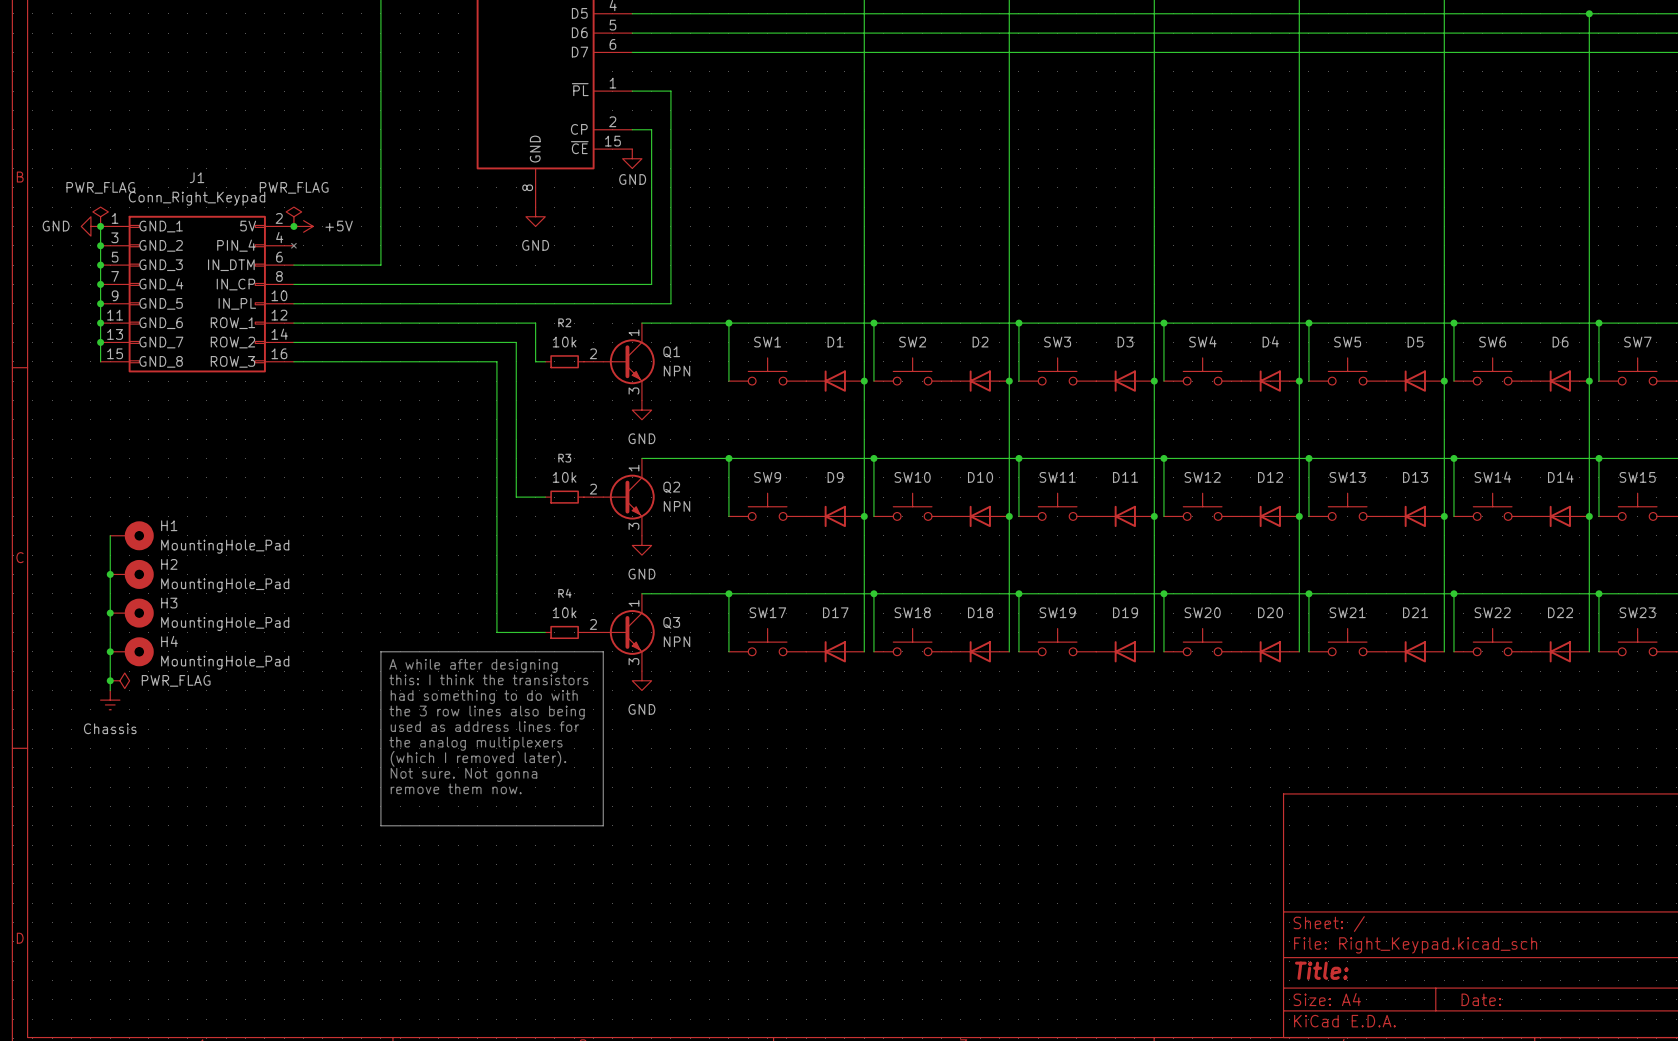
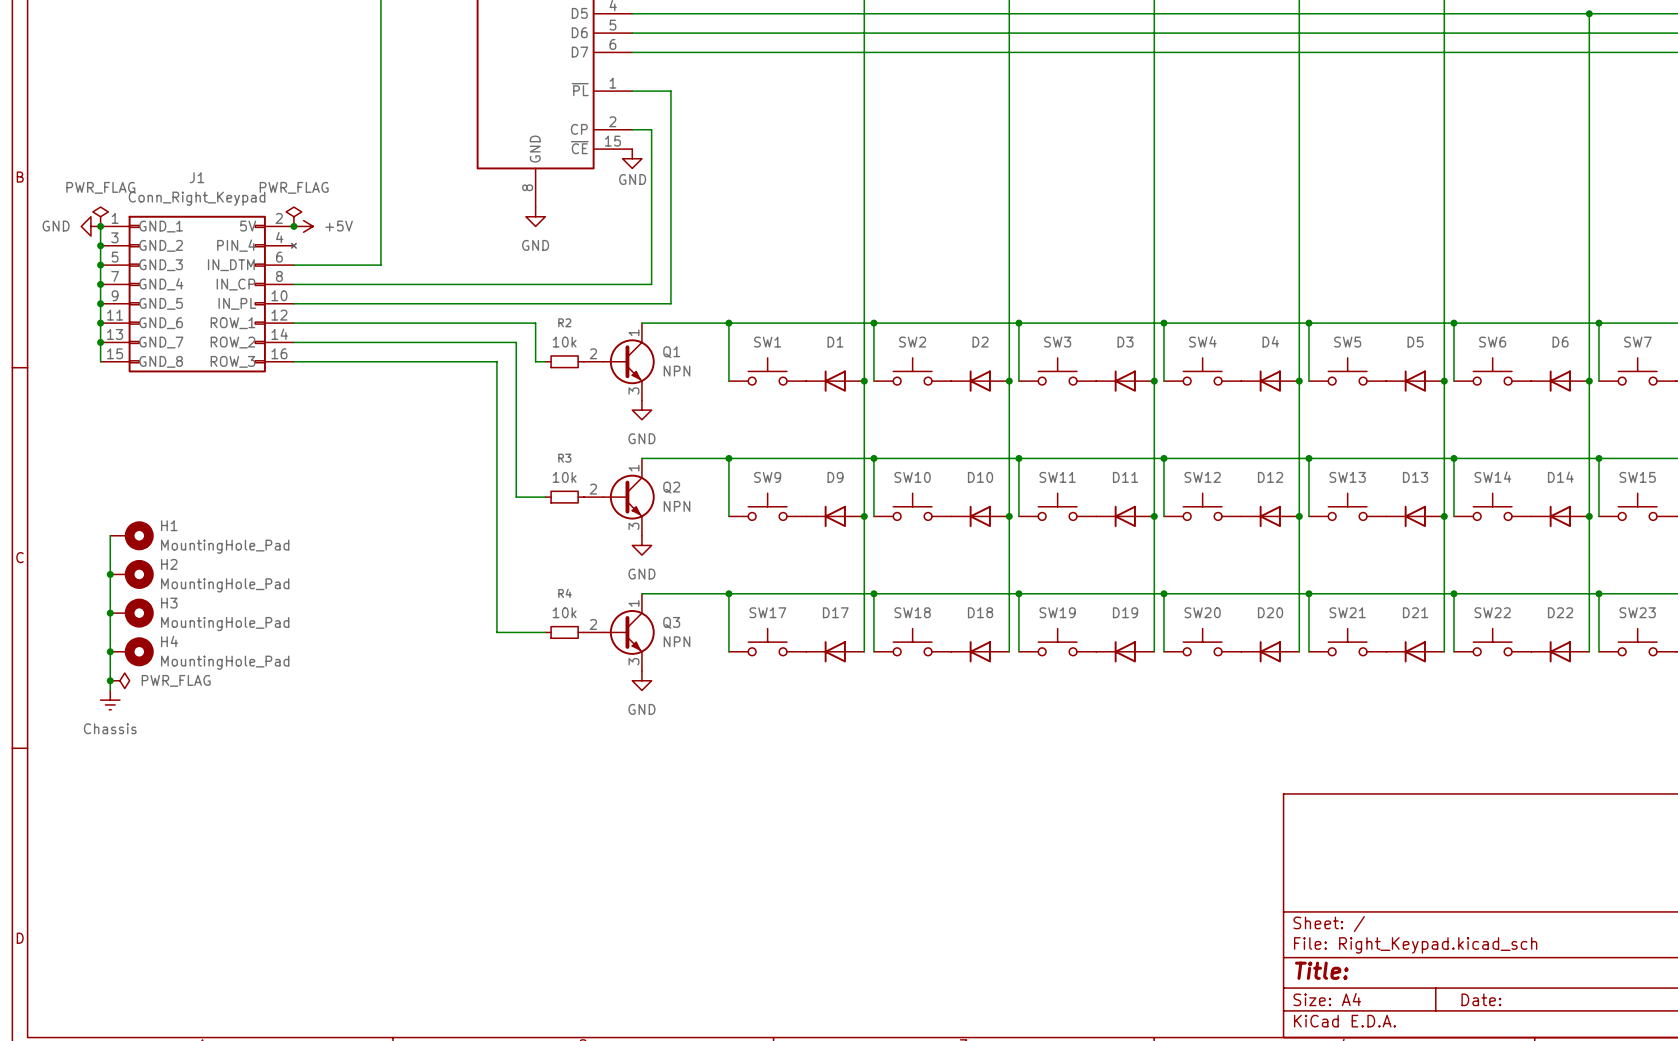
line: (380, 651) (603, 651) (603, 825) (380, 825) (380, 651) -> none
text: A while after designing (473, 665) -> none
text: this: I think the transistors (488, 679) -> none
text: had something to do with (484, 697) -> none
text: the 3 row lines also being (487, 712) -> none
text: used as address lines for (484, 726) -> none
text: the analog multiplexers (475, 743) -> none
text: (which I removed later). (478, 758) -> none
text: Not sure. Not gonna (463, 774) -> none
text: remove them now. (456, 788) -> none

